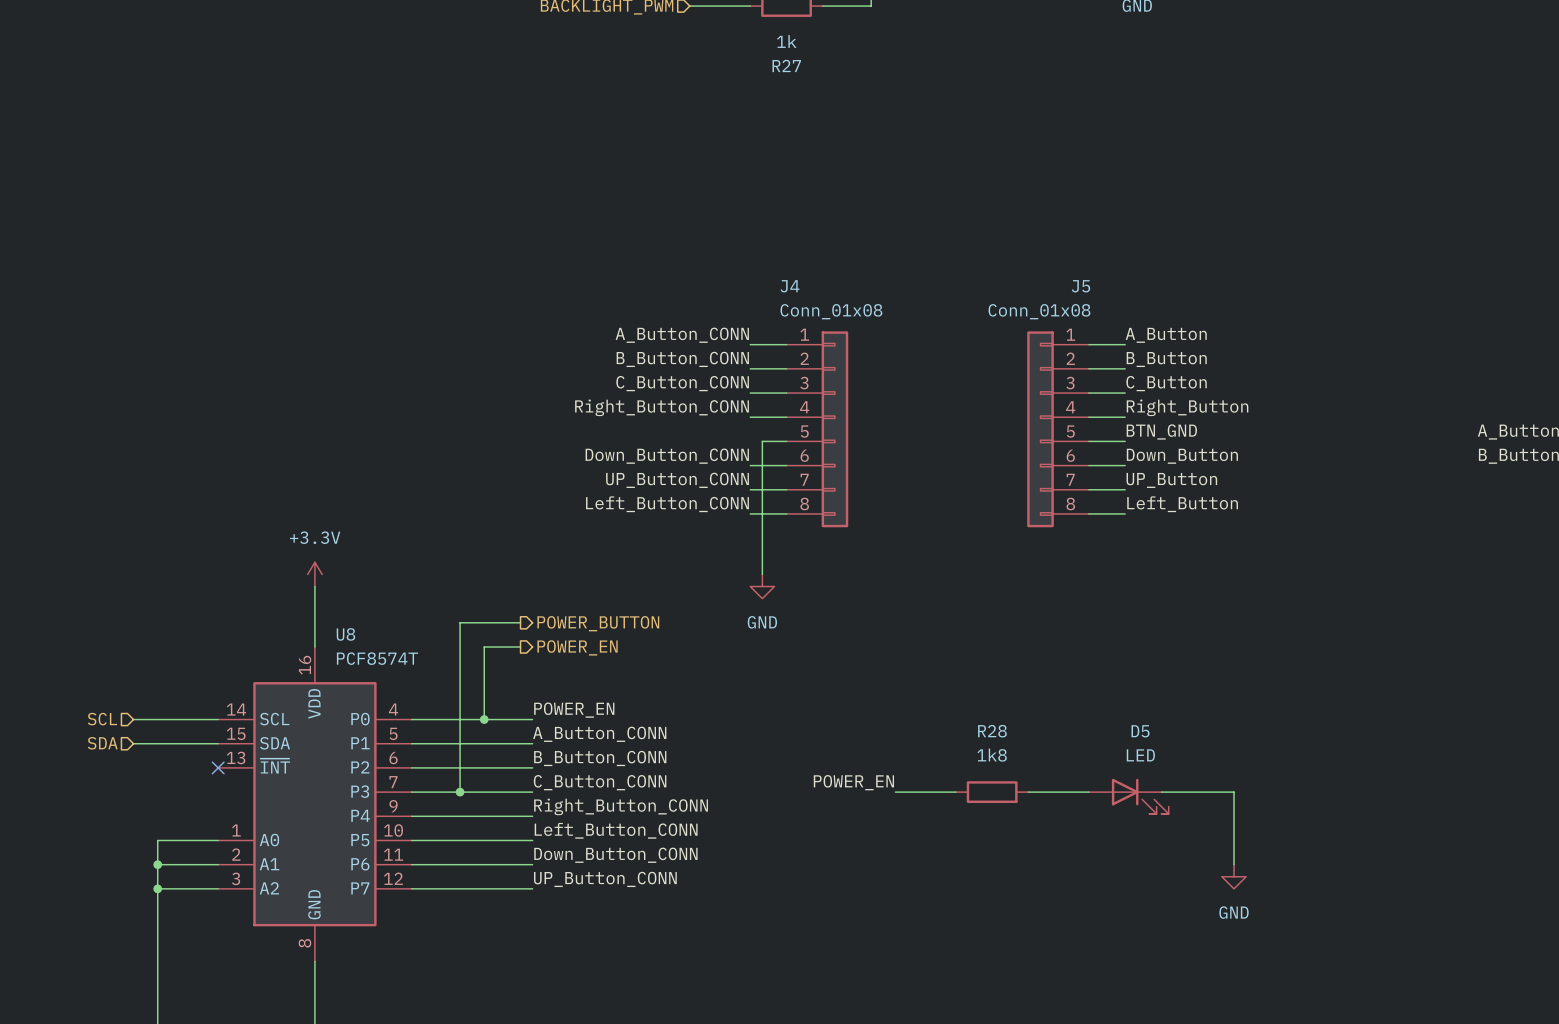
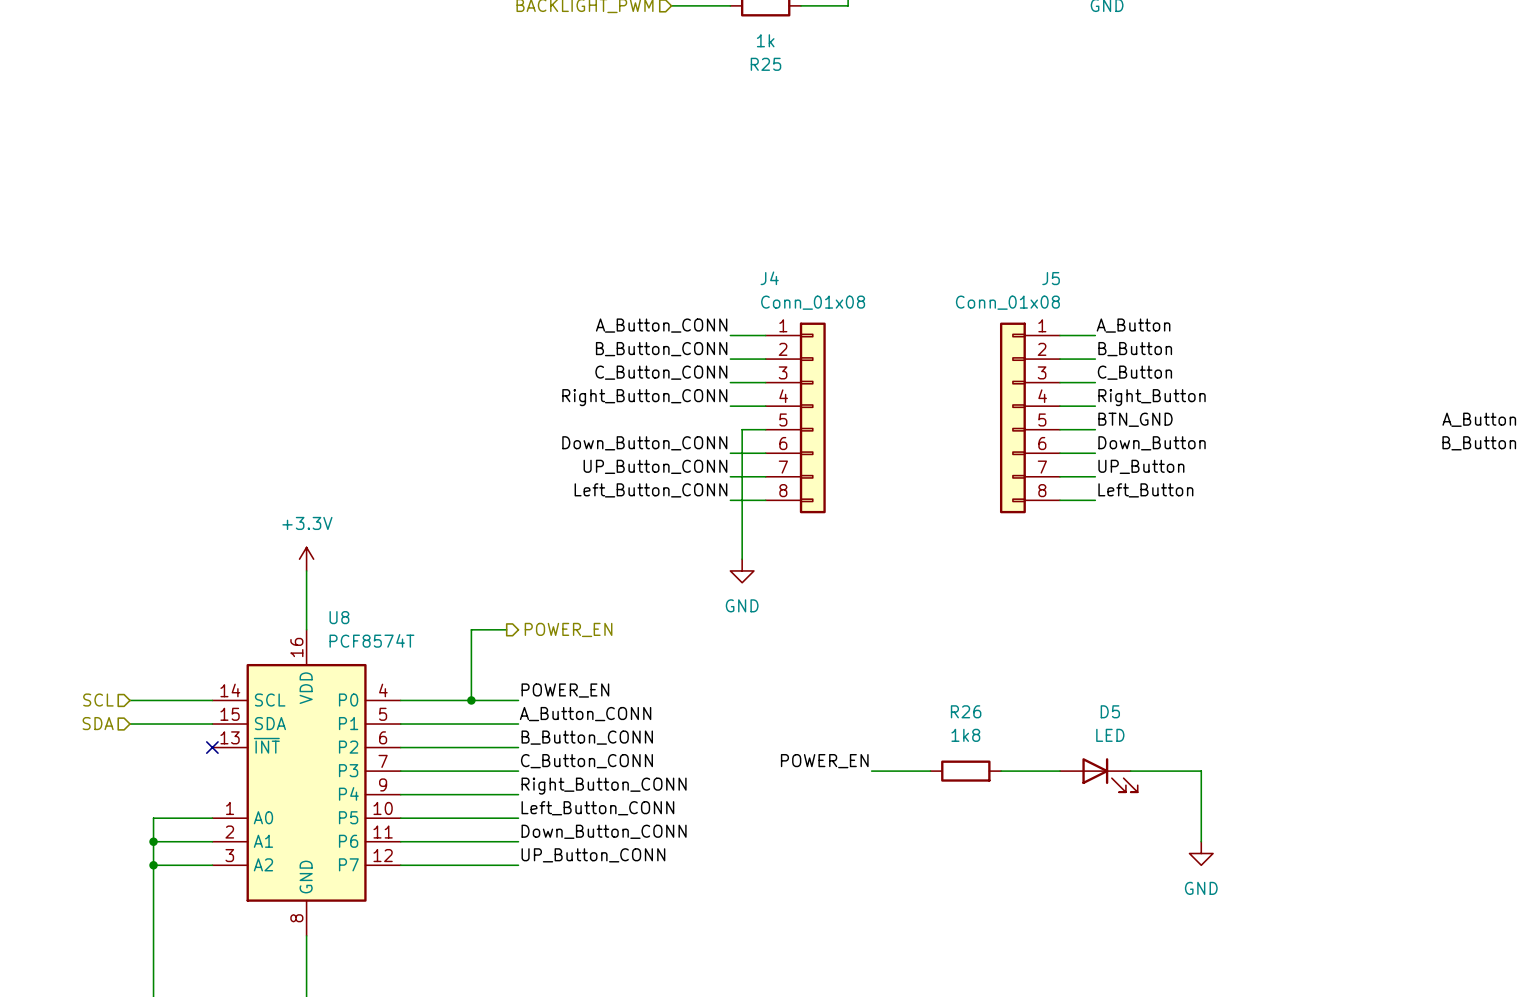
R27 name: R27 (786, 65) -> R25 (765, 64)
wire: (520, 622) (460, 622) (460, 792) -> none
hierarchical label: POWER_BUTTON (598, 623) -> none
R28 name: R28 (992, 731) -> R26 (966, 711)
junction: (460, 792) -> none

